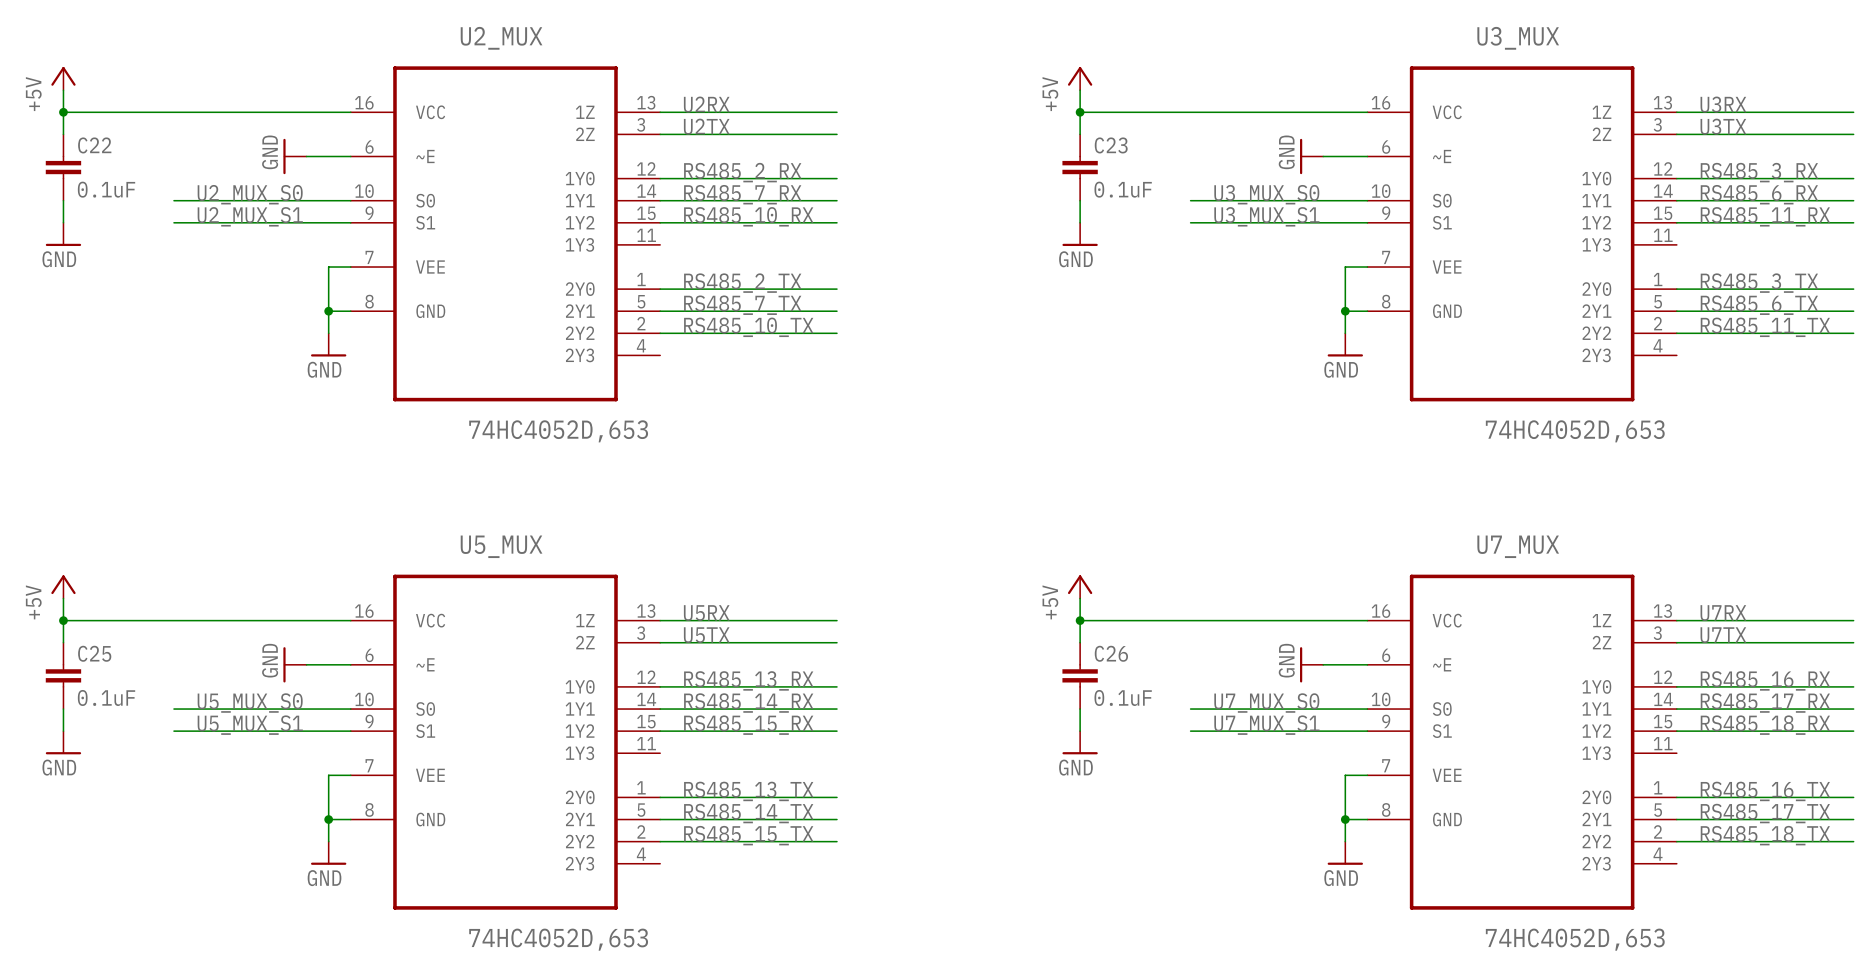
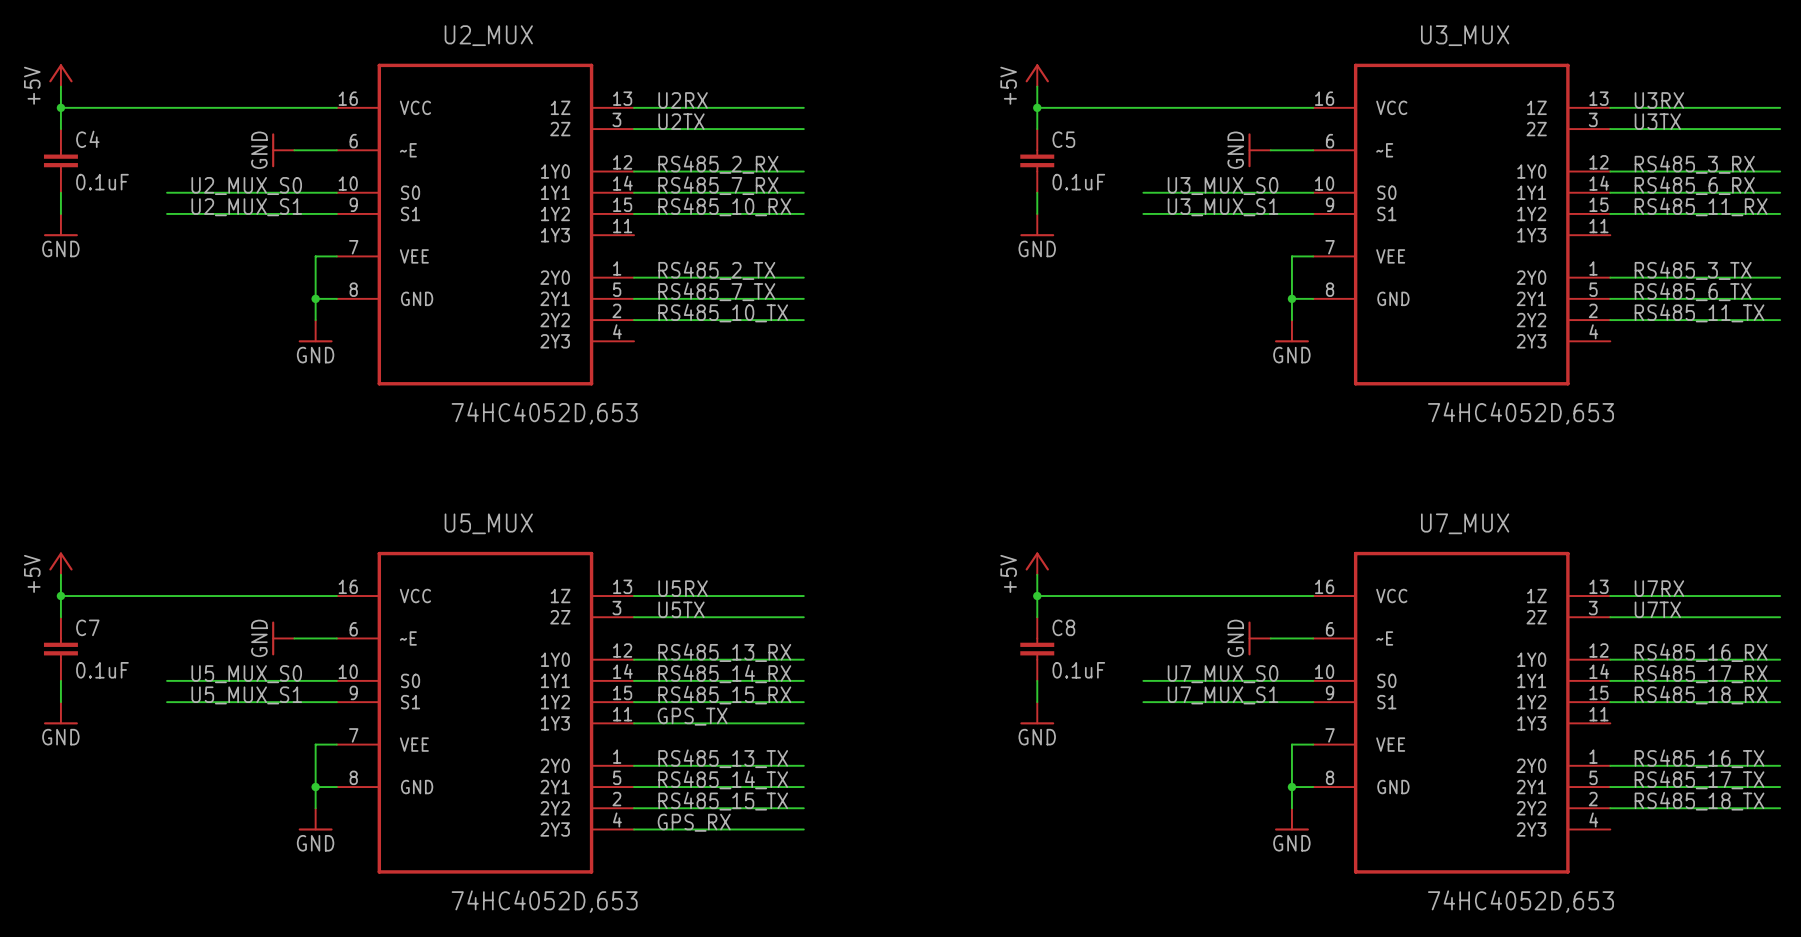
C22 name: C22 (94, 145) -> C4 (87, 139)
C23 name: C23 (1111, 145) -> C5 (1063, 139)
C25 name: C25 (94, 653) -> C7 (87, 627)
C26 name: C26 (1111, 653) -> C8 (1063, 627)
label: none -> GPS_TX (692, 716)
wire: none -> (634, 723) (803, 723)
label: none -> GPS_RX (694, 822)
wire: none -> (634, 829) (803, 829)

